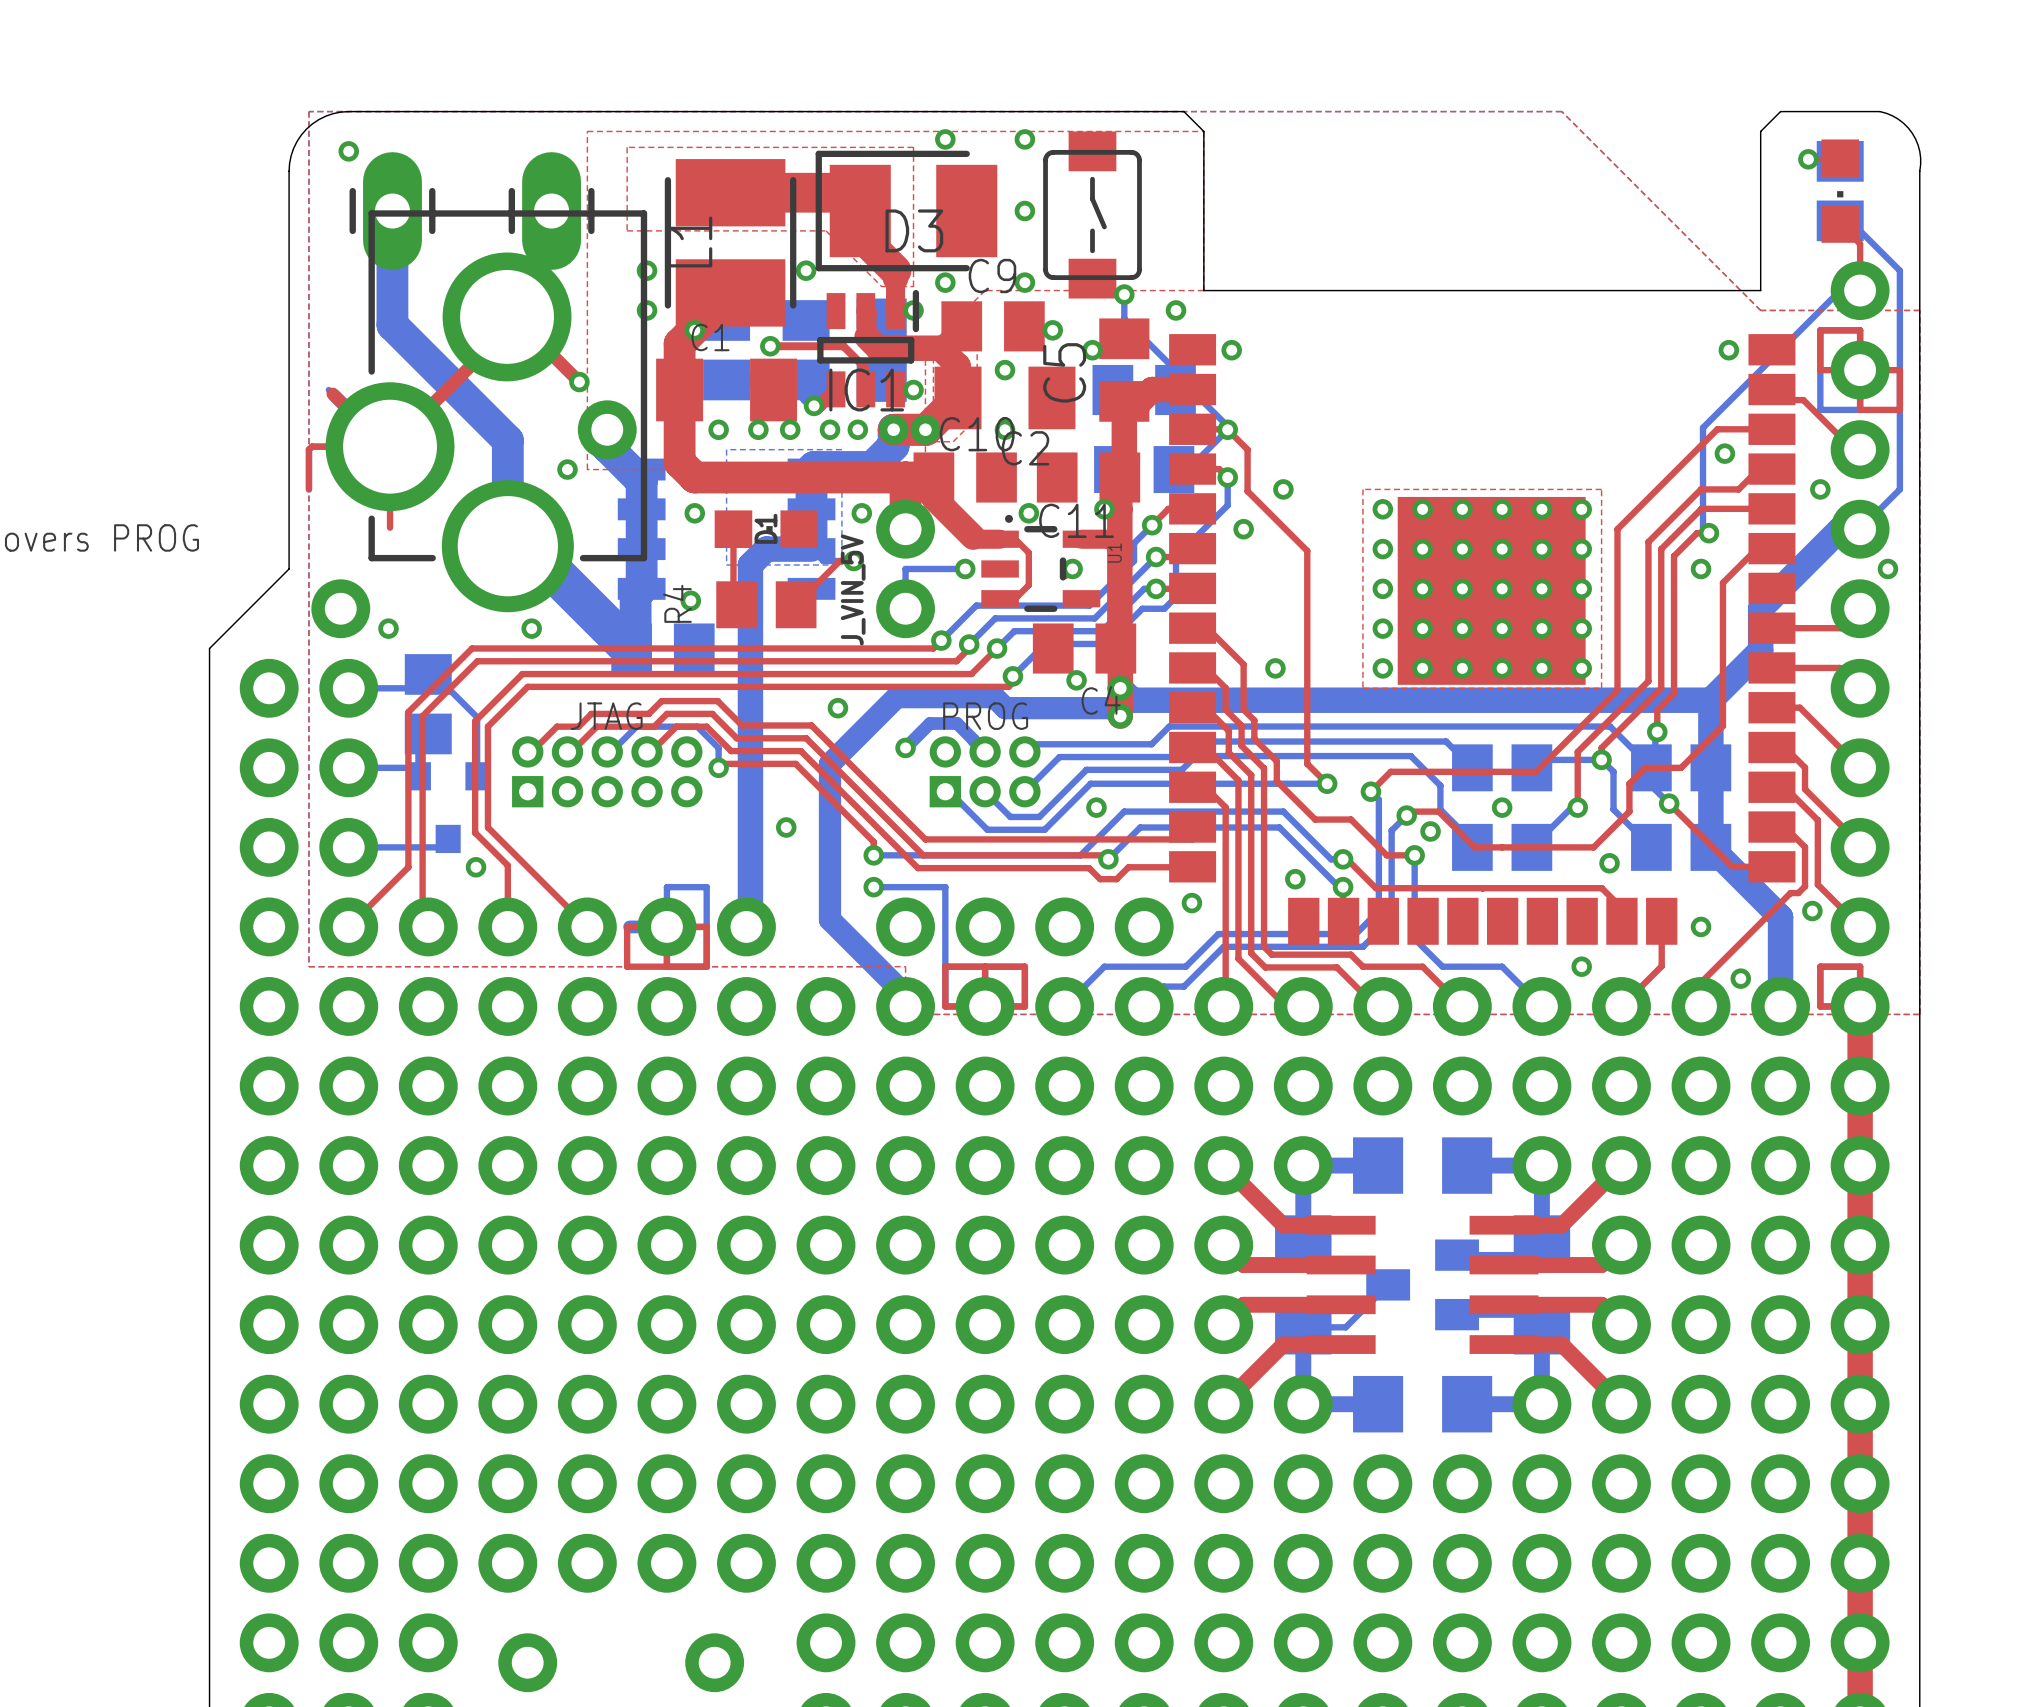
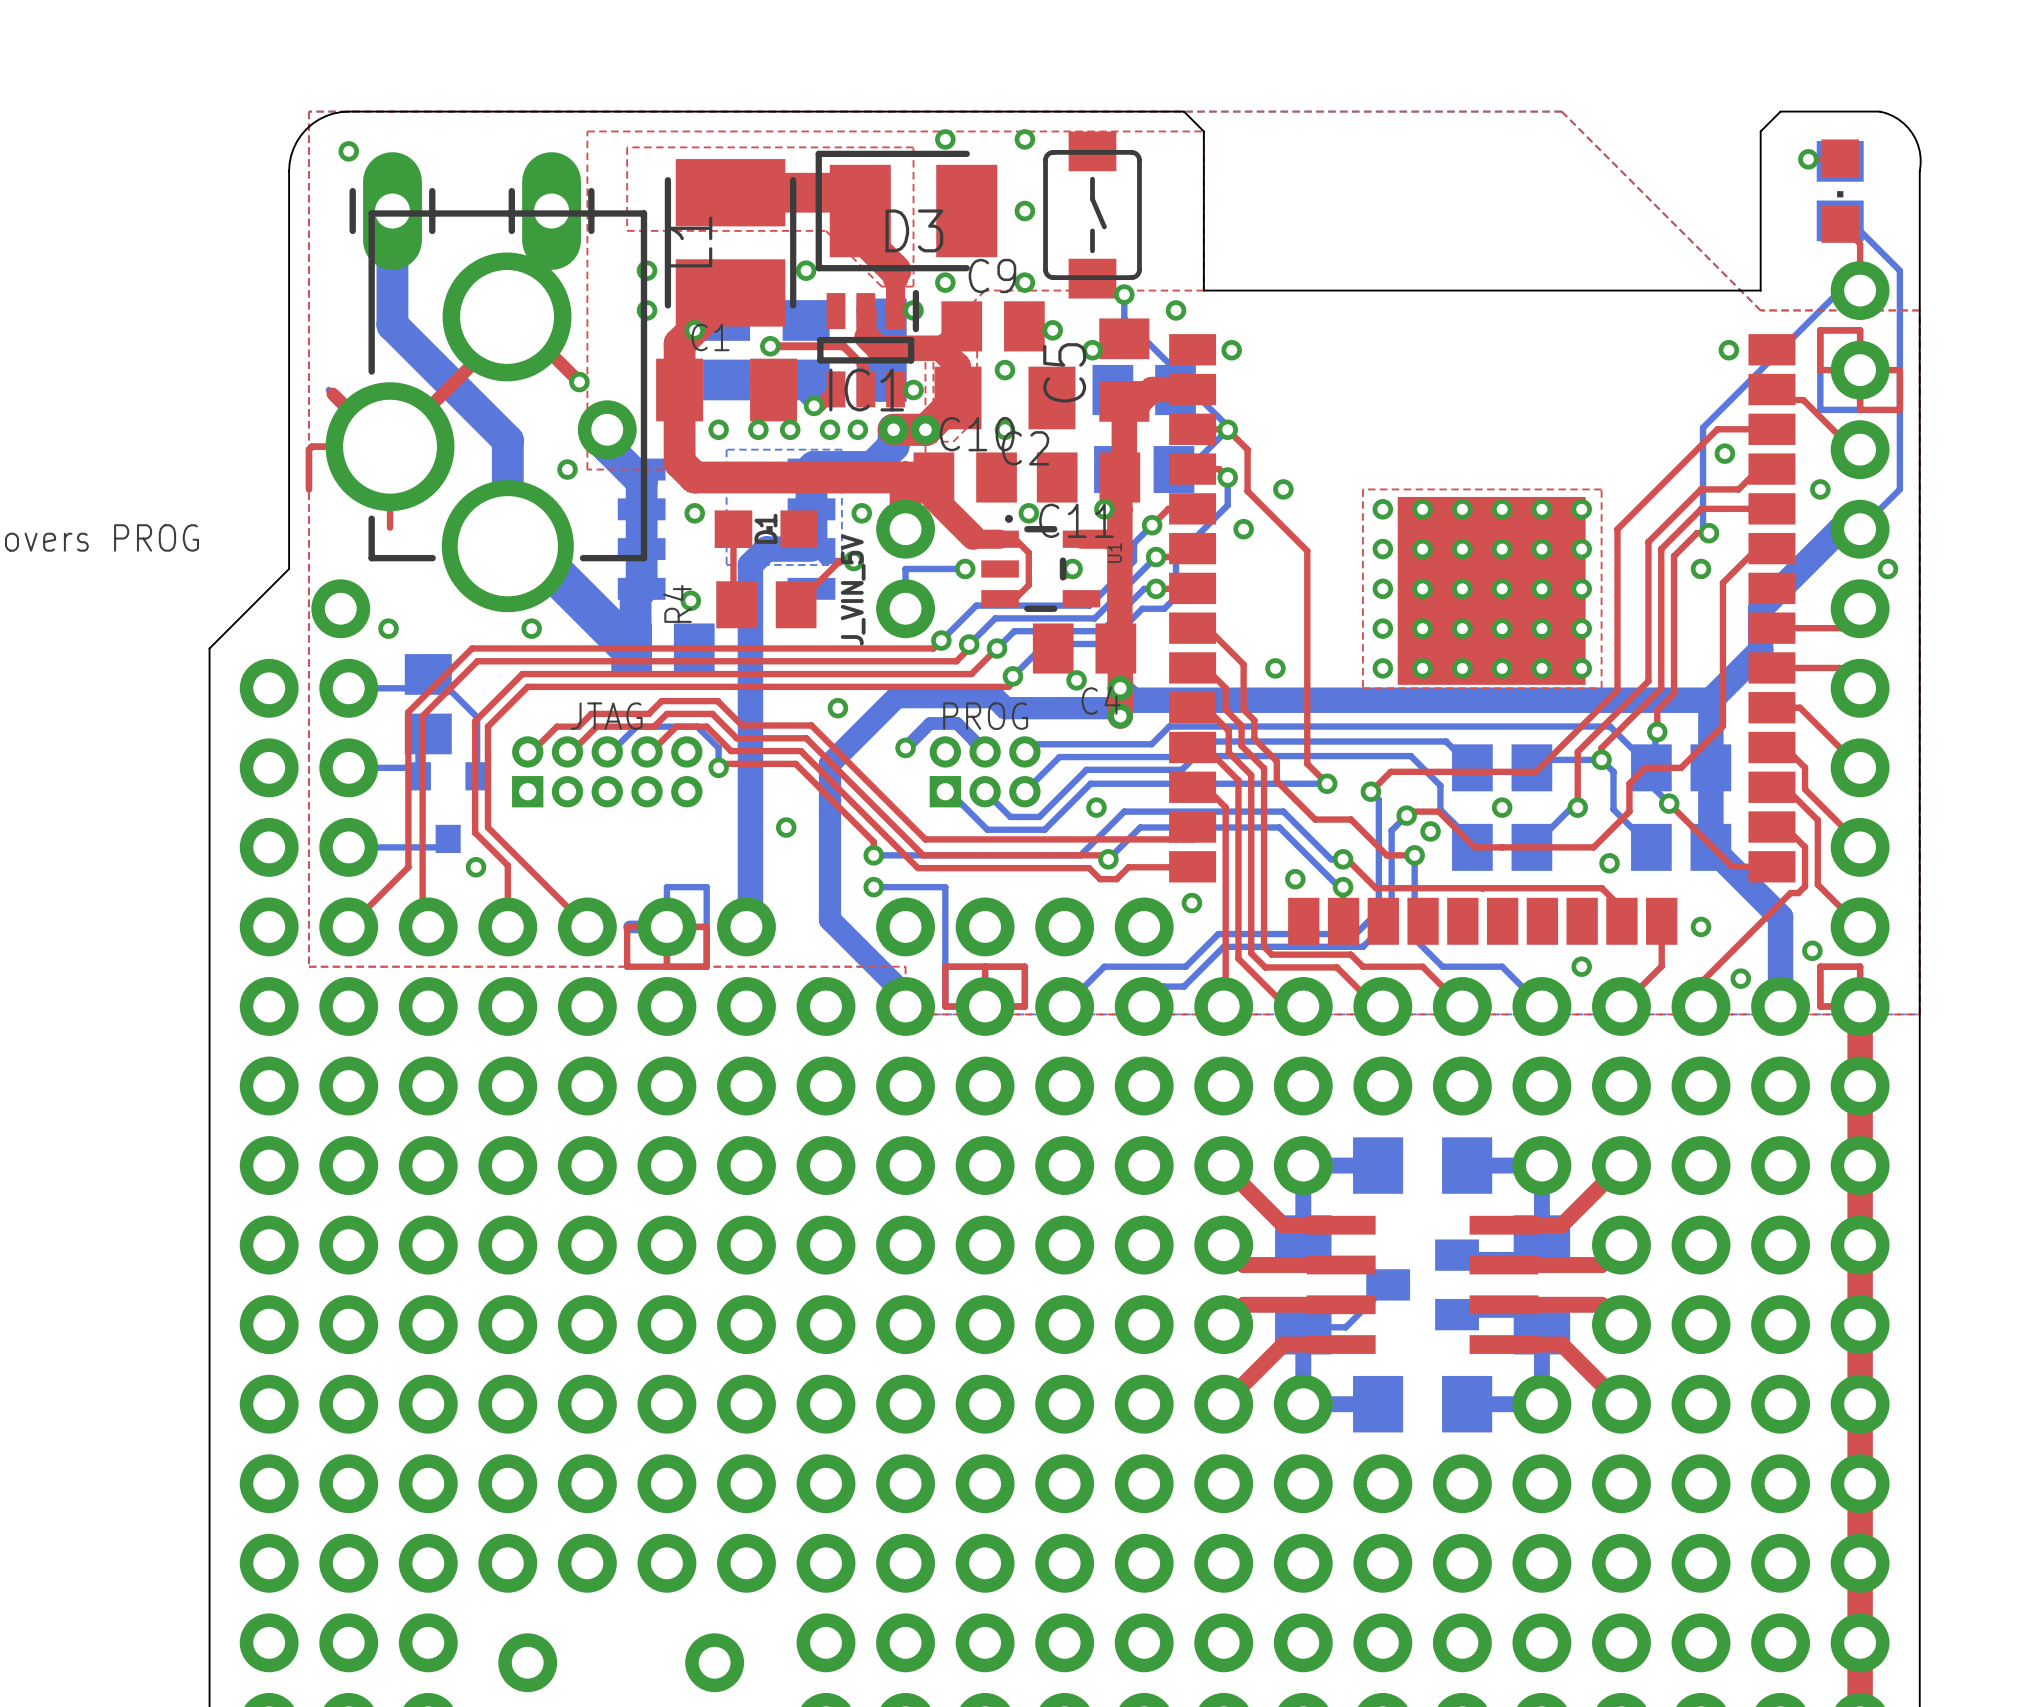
via position: (1812, 911) -> (1812, 950)

